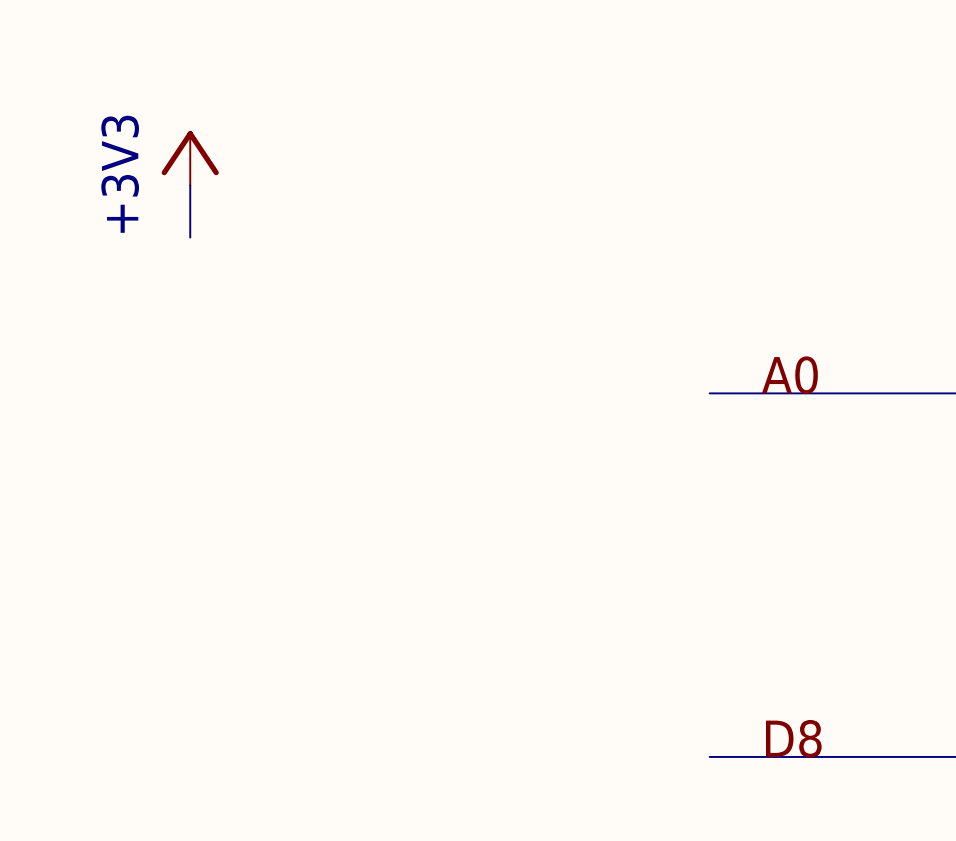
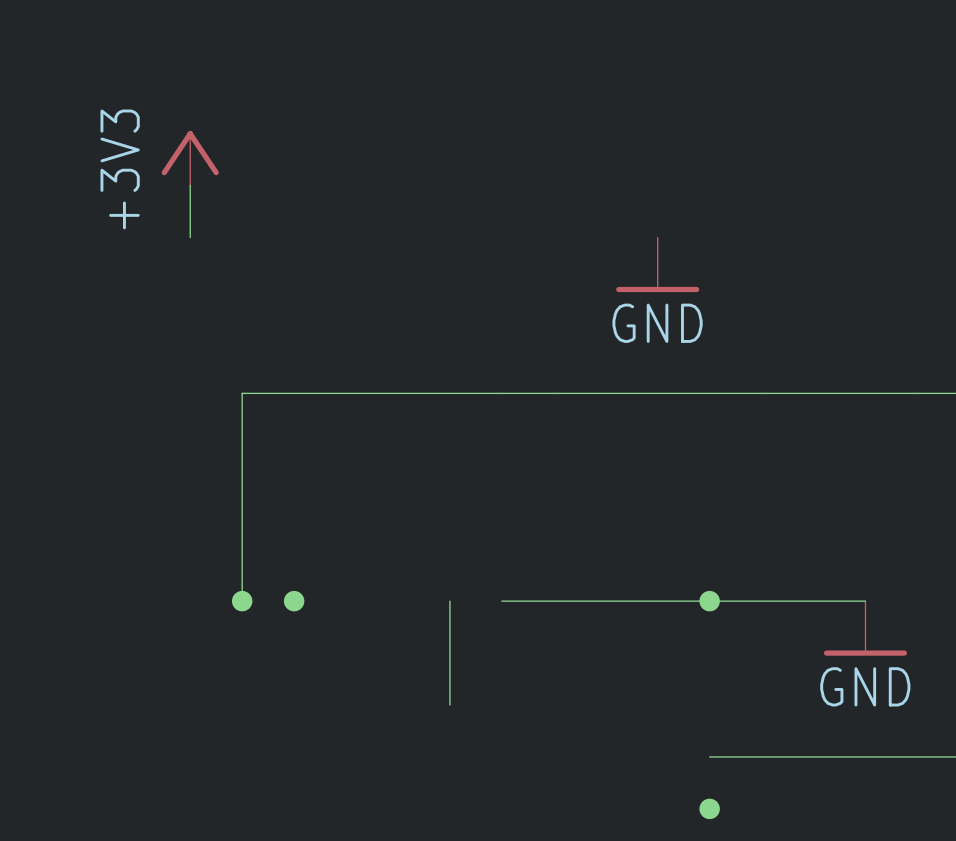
power symbol: none -> GND (657, 264)
label: A0 (789, 375) -> none
wire: none -> (709, 393) (242, 393) (242, 601)
junction: none -> (242, 601)
junction: none -> (294, 601)
wire: none -> (449, 601) (449, 705)
wire: none -> (501, 601) (865, 601)
junction: none -> (709, 601)
power symbol: none -> GND (865, 628)
label: D8 (793, 738) -> none
junction: none -> (709, 808)

